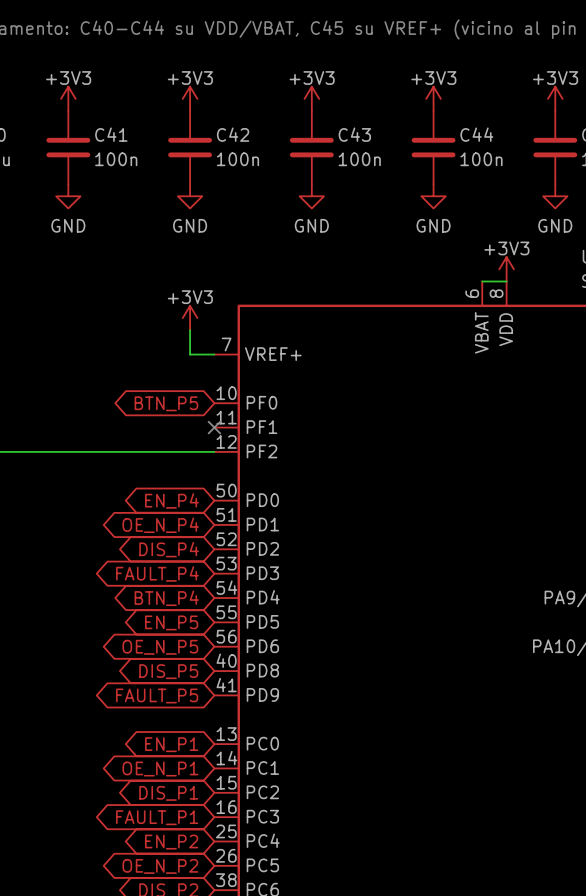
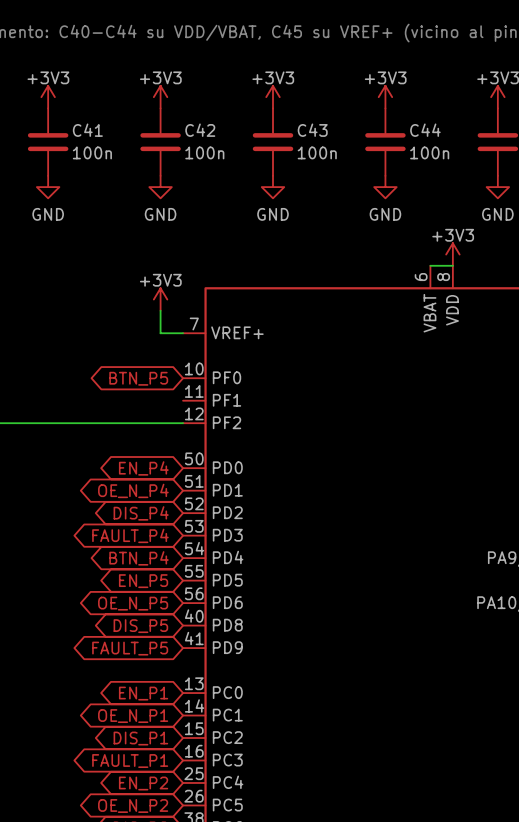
no-connect mark: (214, 427) -> none

